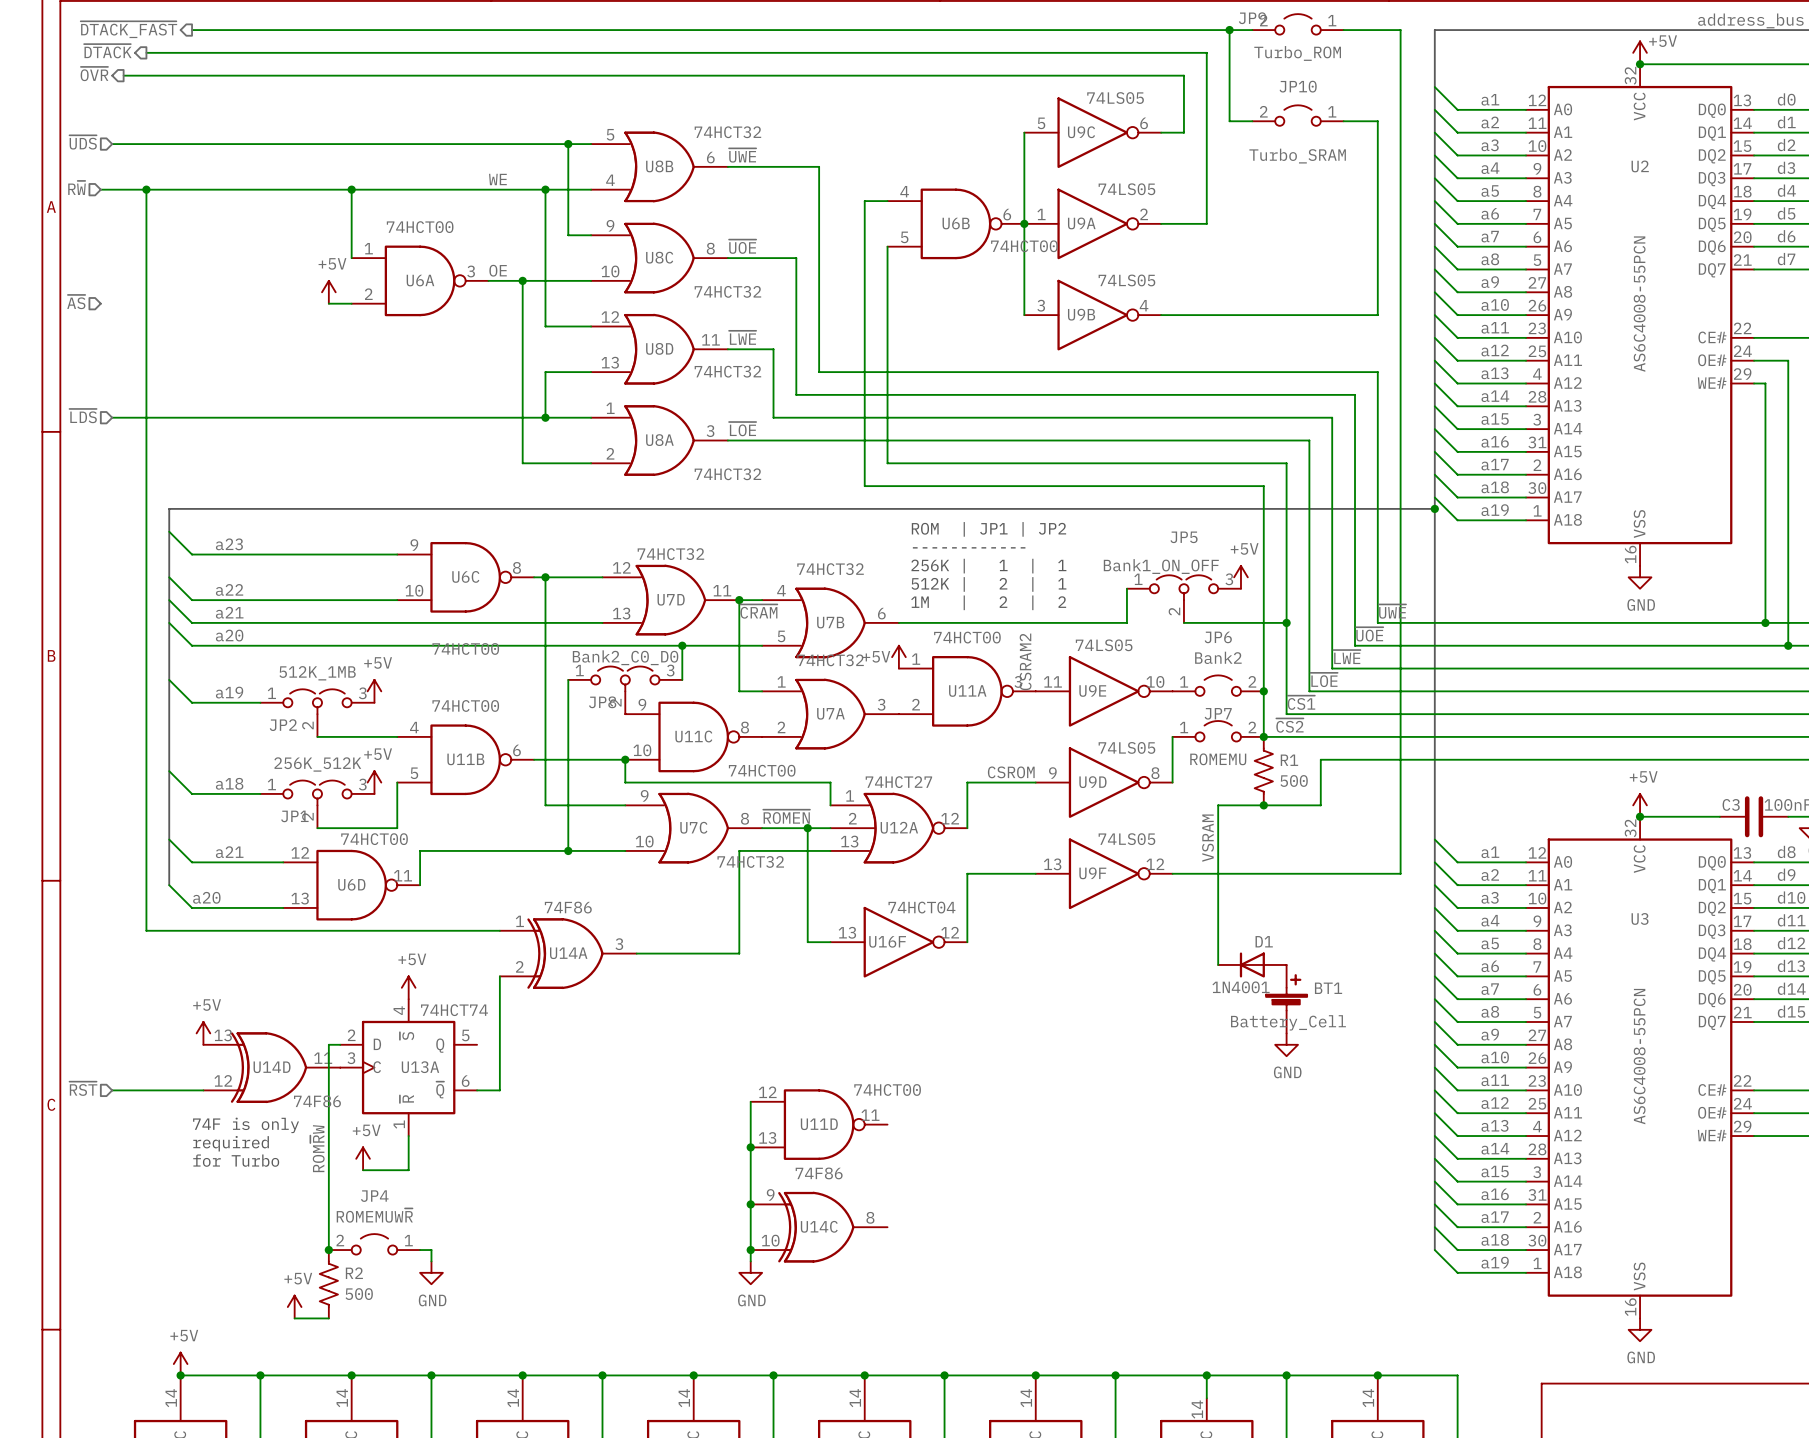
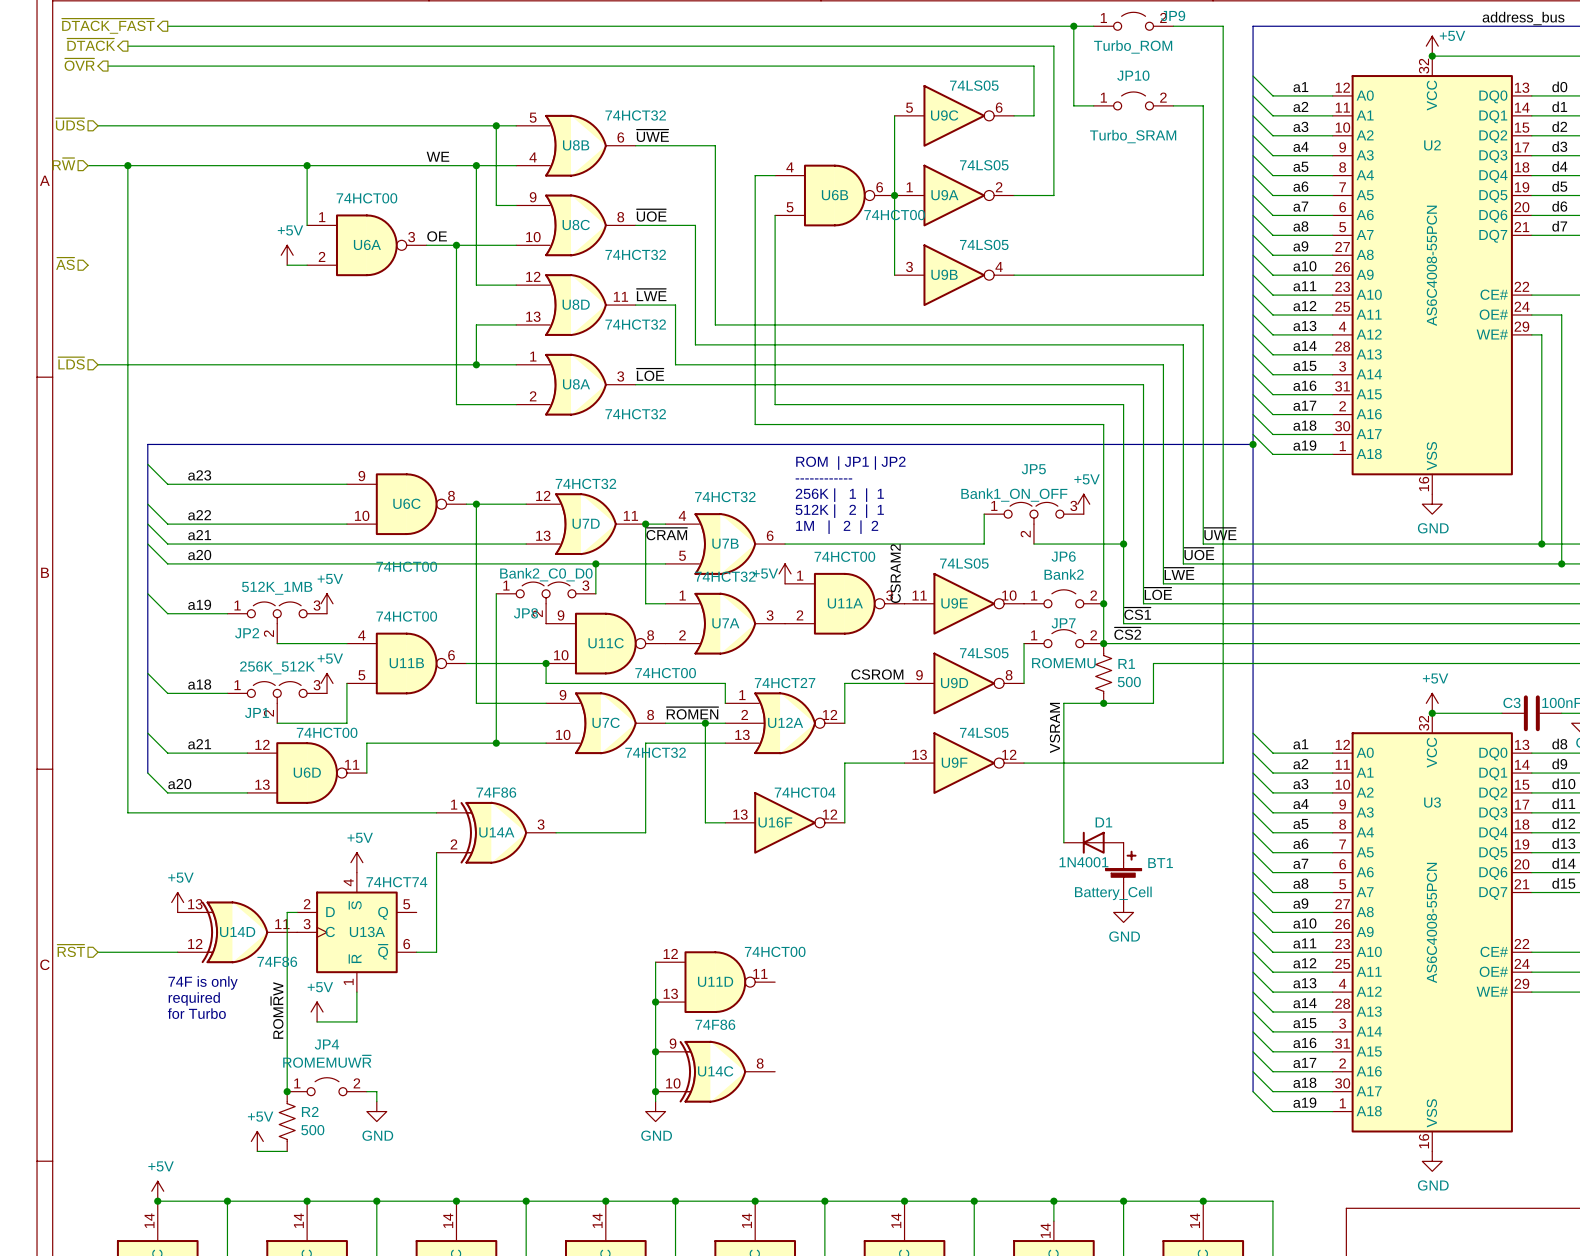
JP9 flip: as is (1297, 24) -> left-right (1133, 21)
JP10 flip: as is (1297, 115) -> left-right (1133, 100)
JP4 flip: as is (374, 1244) -> left-right (327, 1086)

